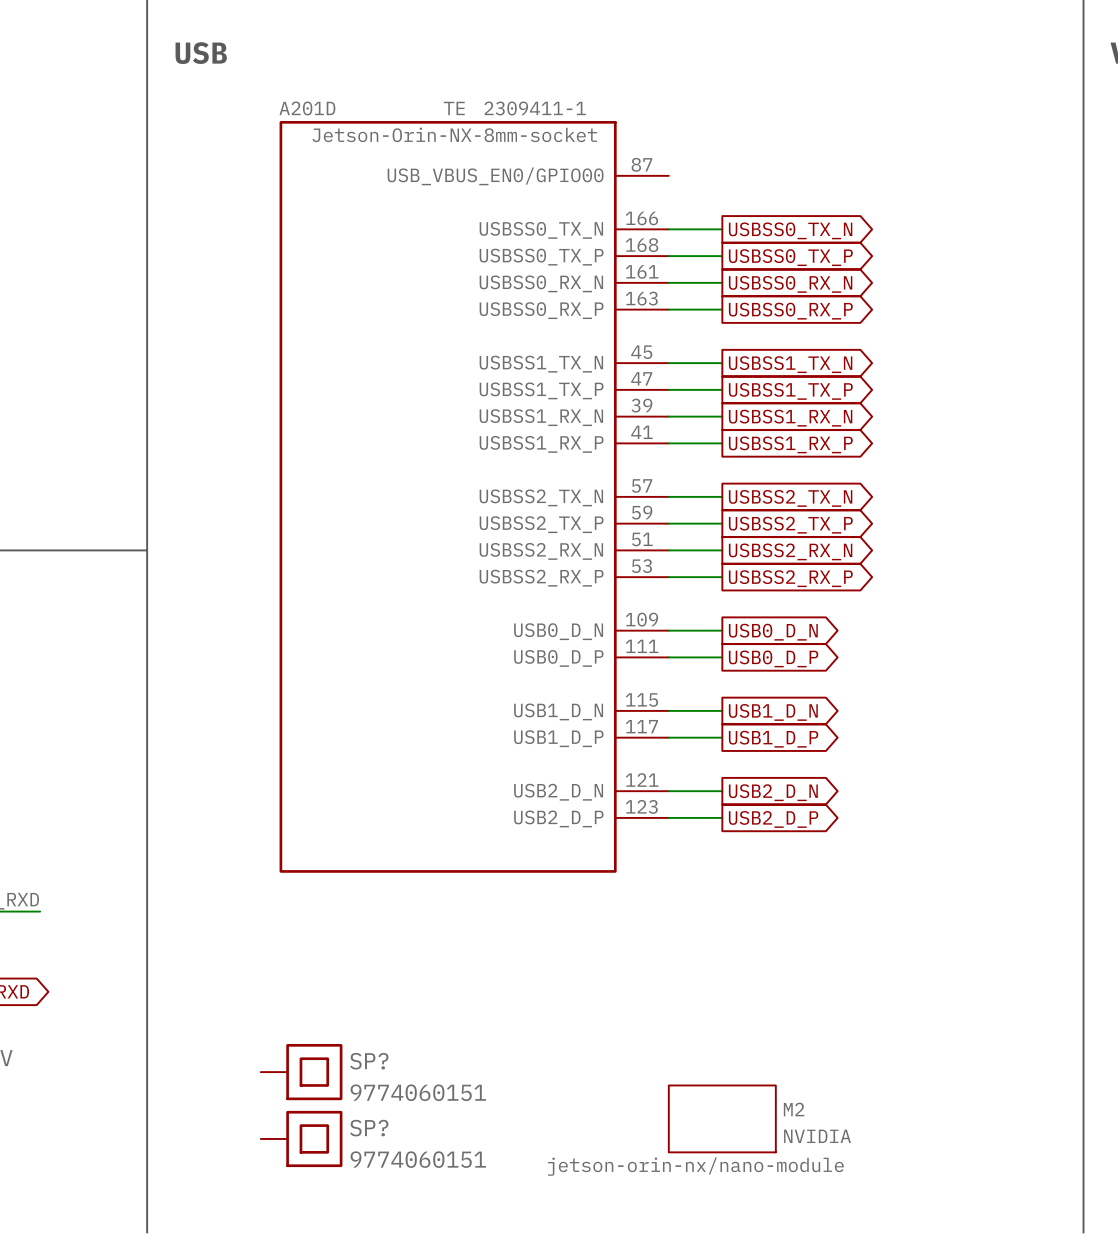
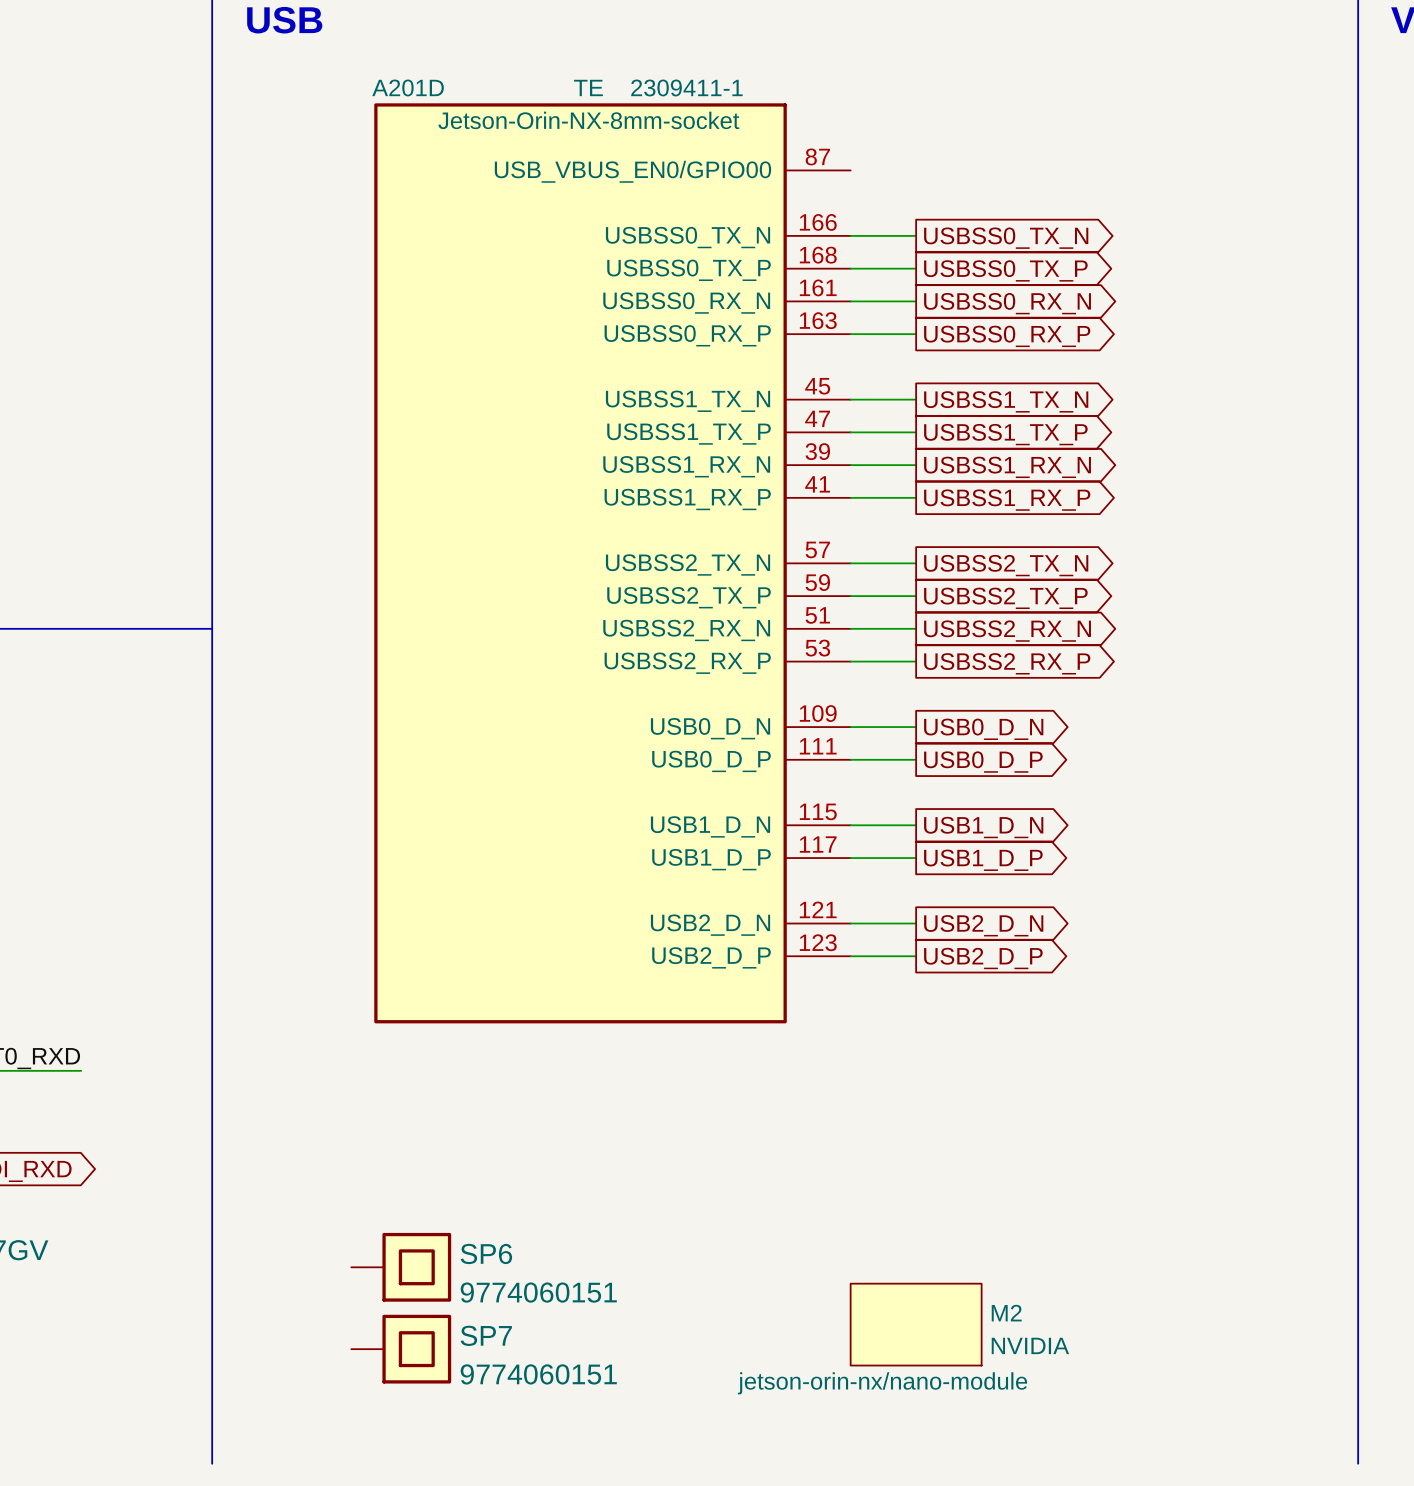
SP? name: SP? (369, 1061) -> SP6 (486, 1253)
SP? name: SP? (369, 1128) -> SP7 (486, 1335)

